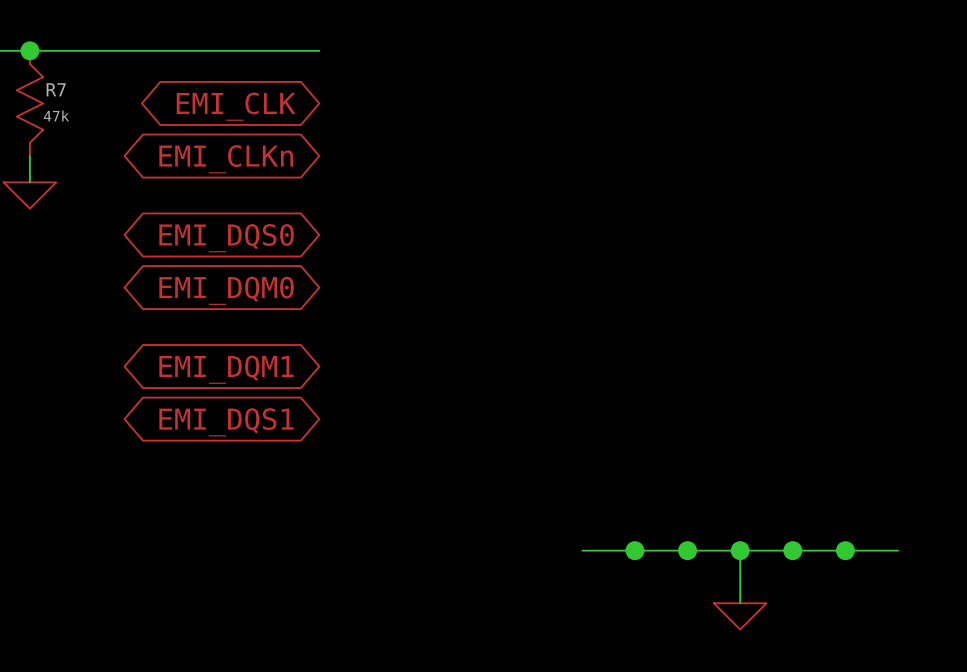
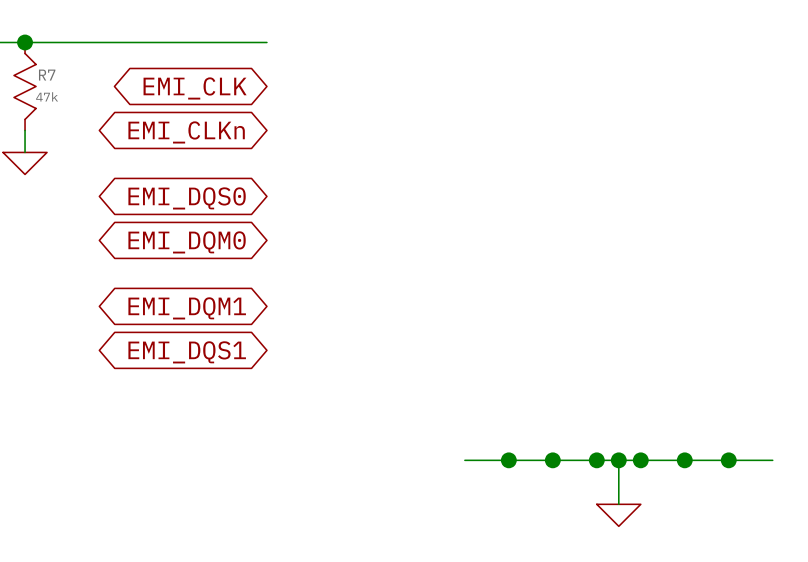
wire: none -> (464, 460) (486, 460)
junction: none -> (508, 460)
junction: (634, 550) -> none
junction: none -> (552, 460)
junction: (687, 550) -> none
junction: none -> (596, 460)
junction: none -> (640, 460)
junction: (792, 550) -> none
junction: none -> (684, 460)
junction: (845, 550) -> none
junction: none -> (728, 460)
wire: none -> (750, 460) (772, 460)

